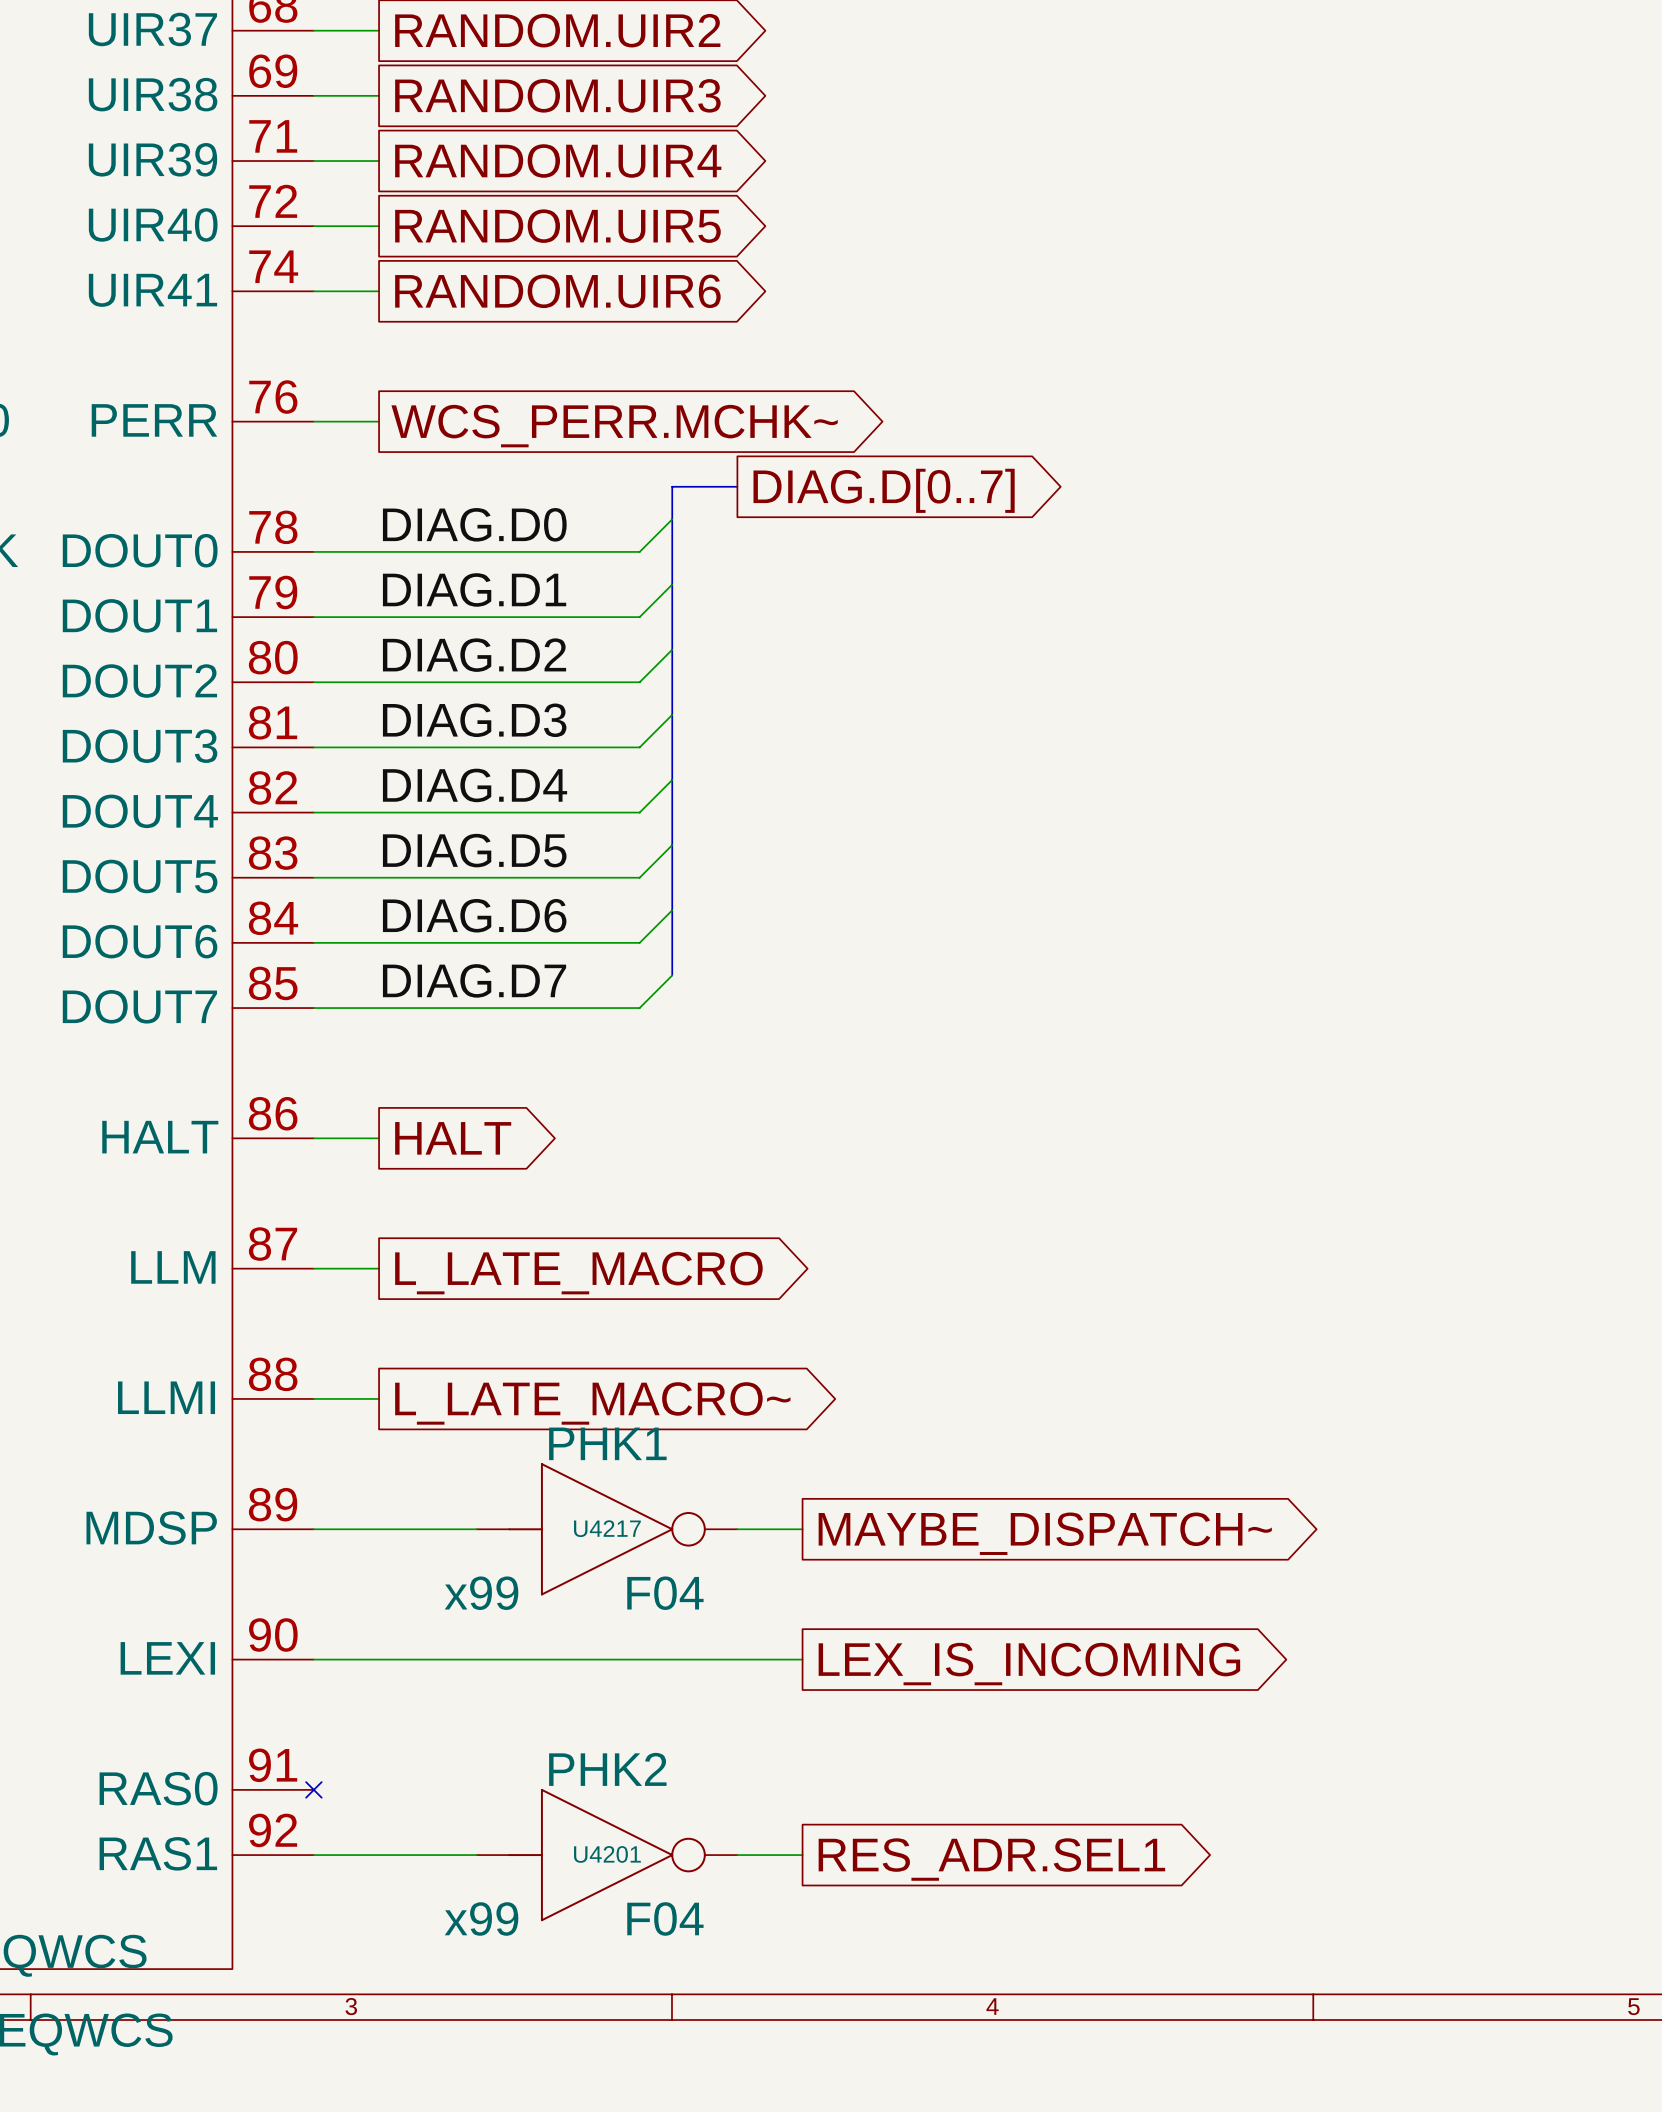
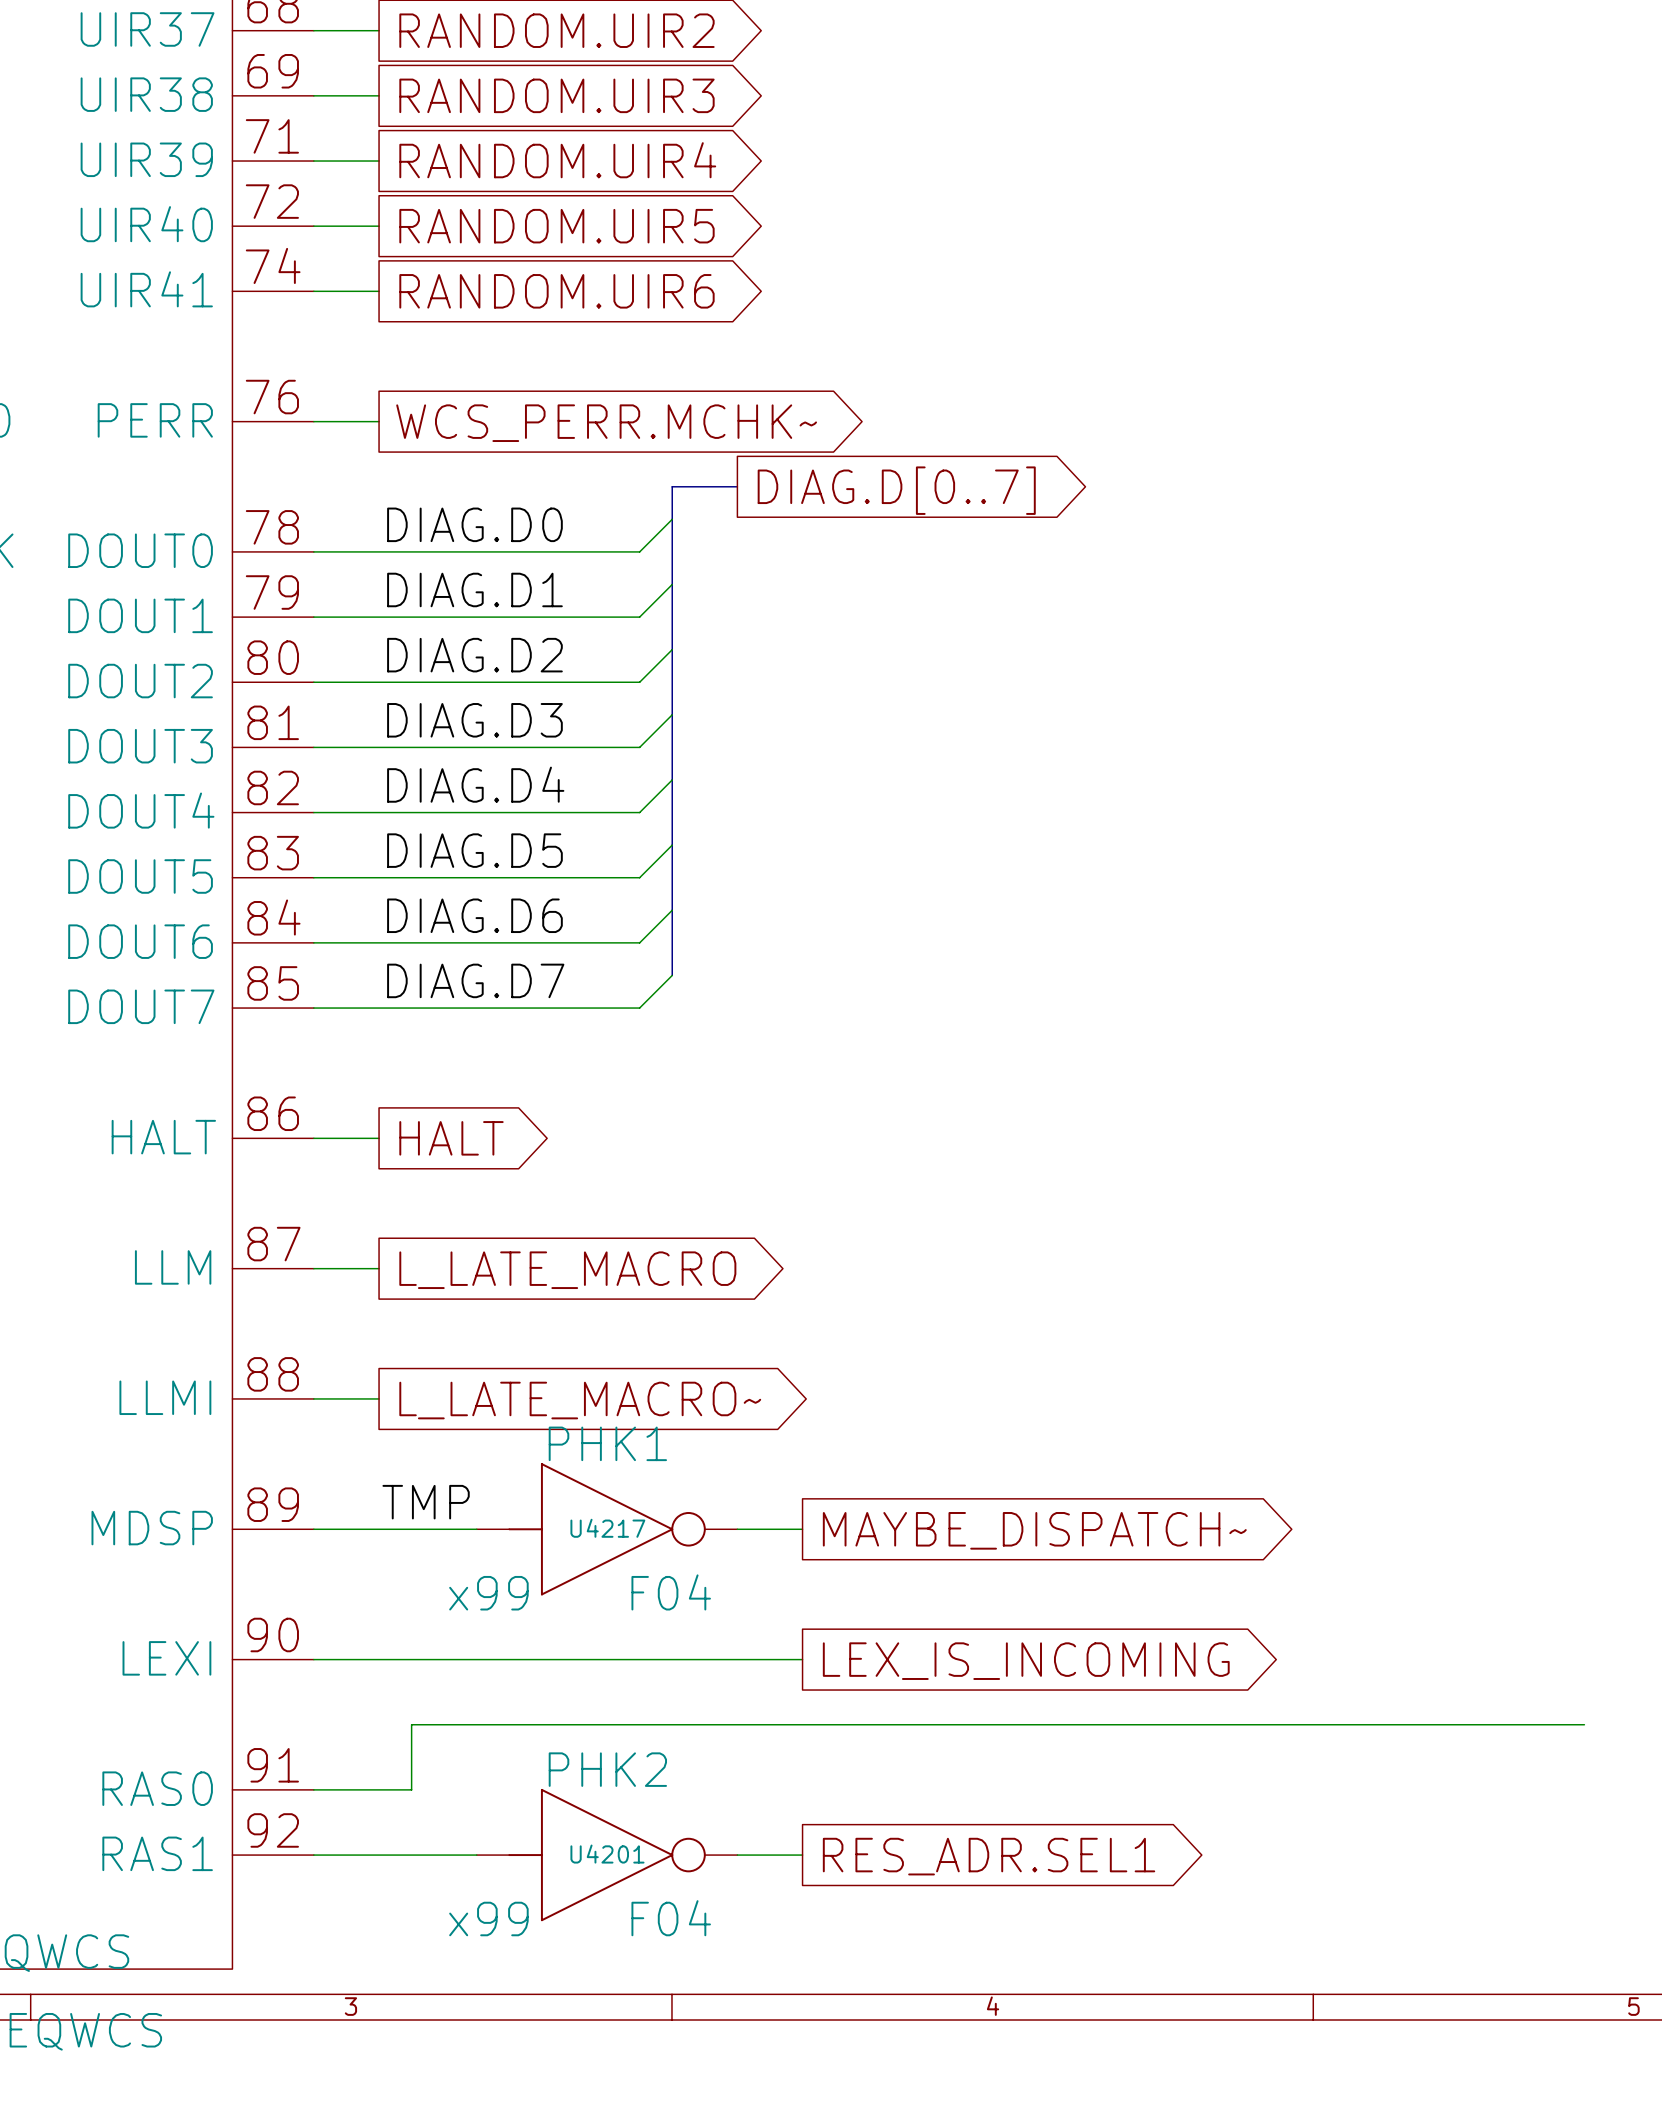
label: none -> TMP (426, 1502)
wire: none -> (1584, 1724) (411, 1724) (411, 1789) (313, 1789)
no-connect mark: (313, 1789) -> none

